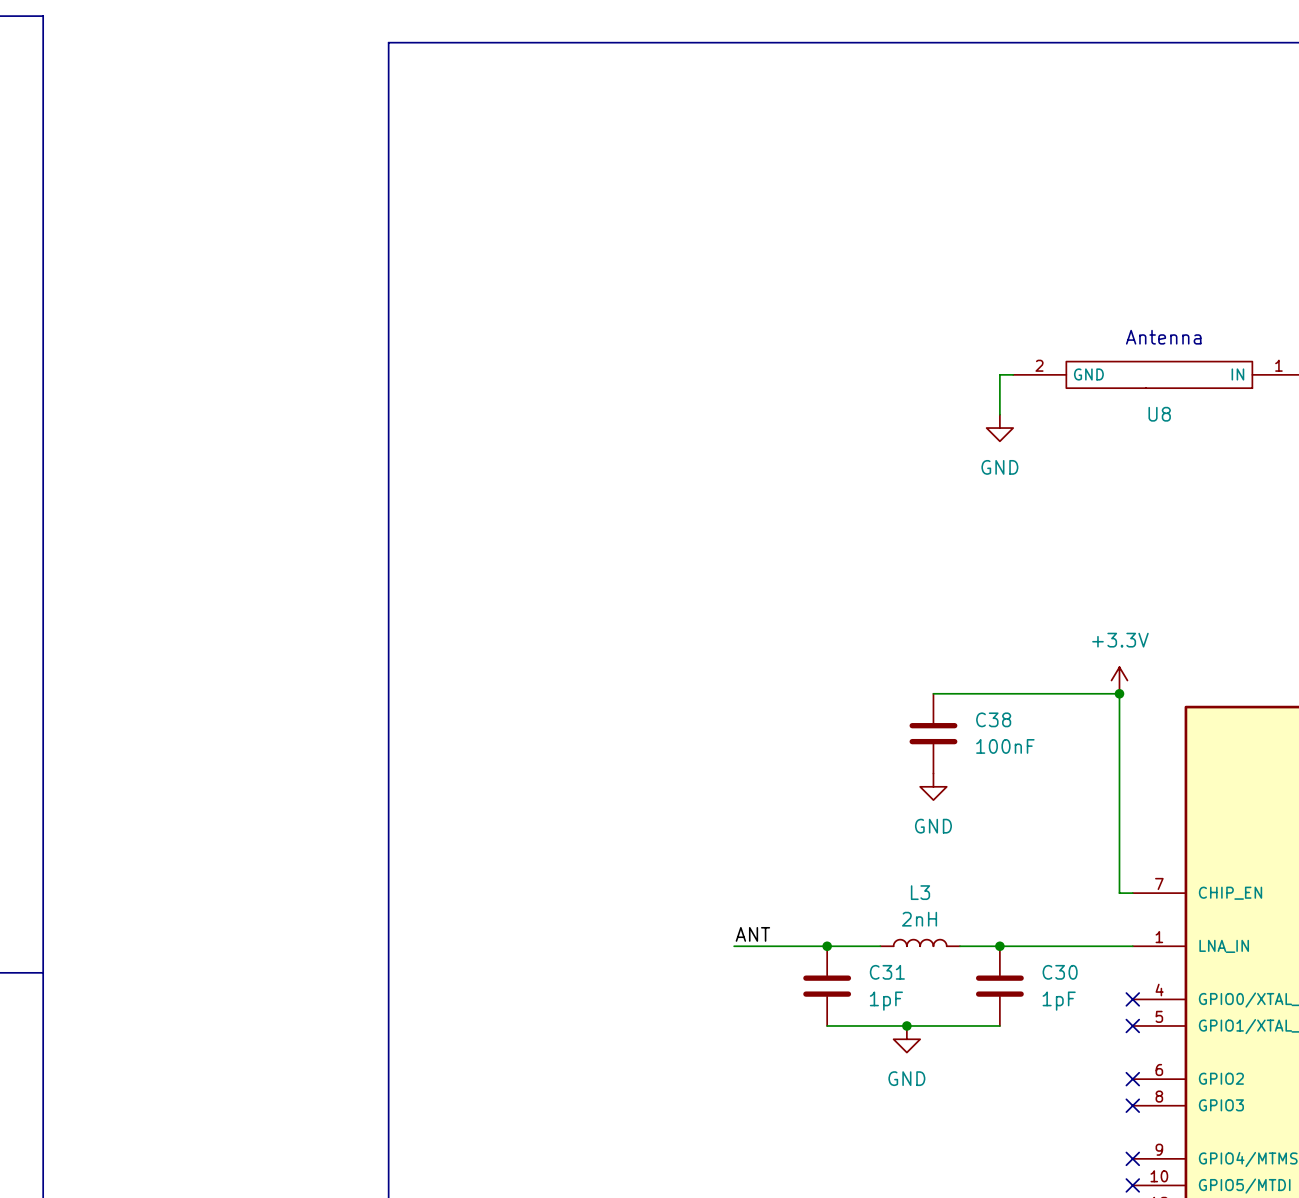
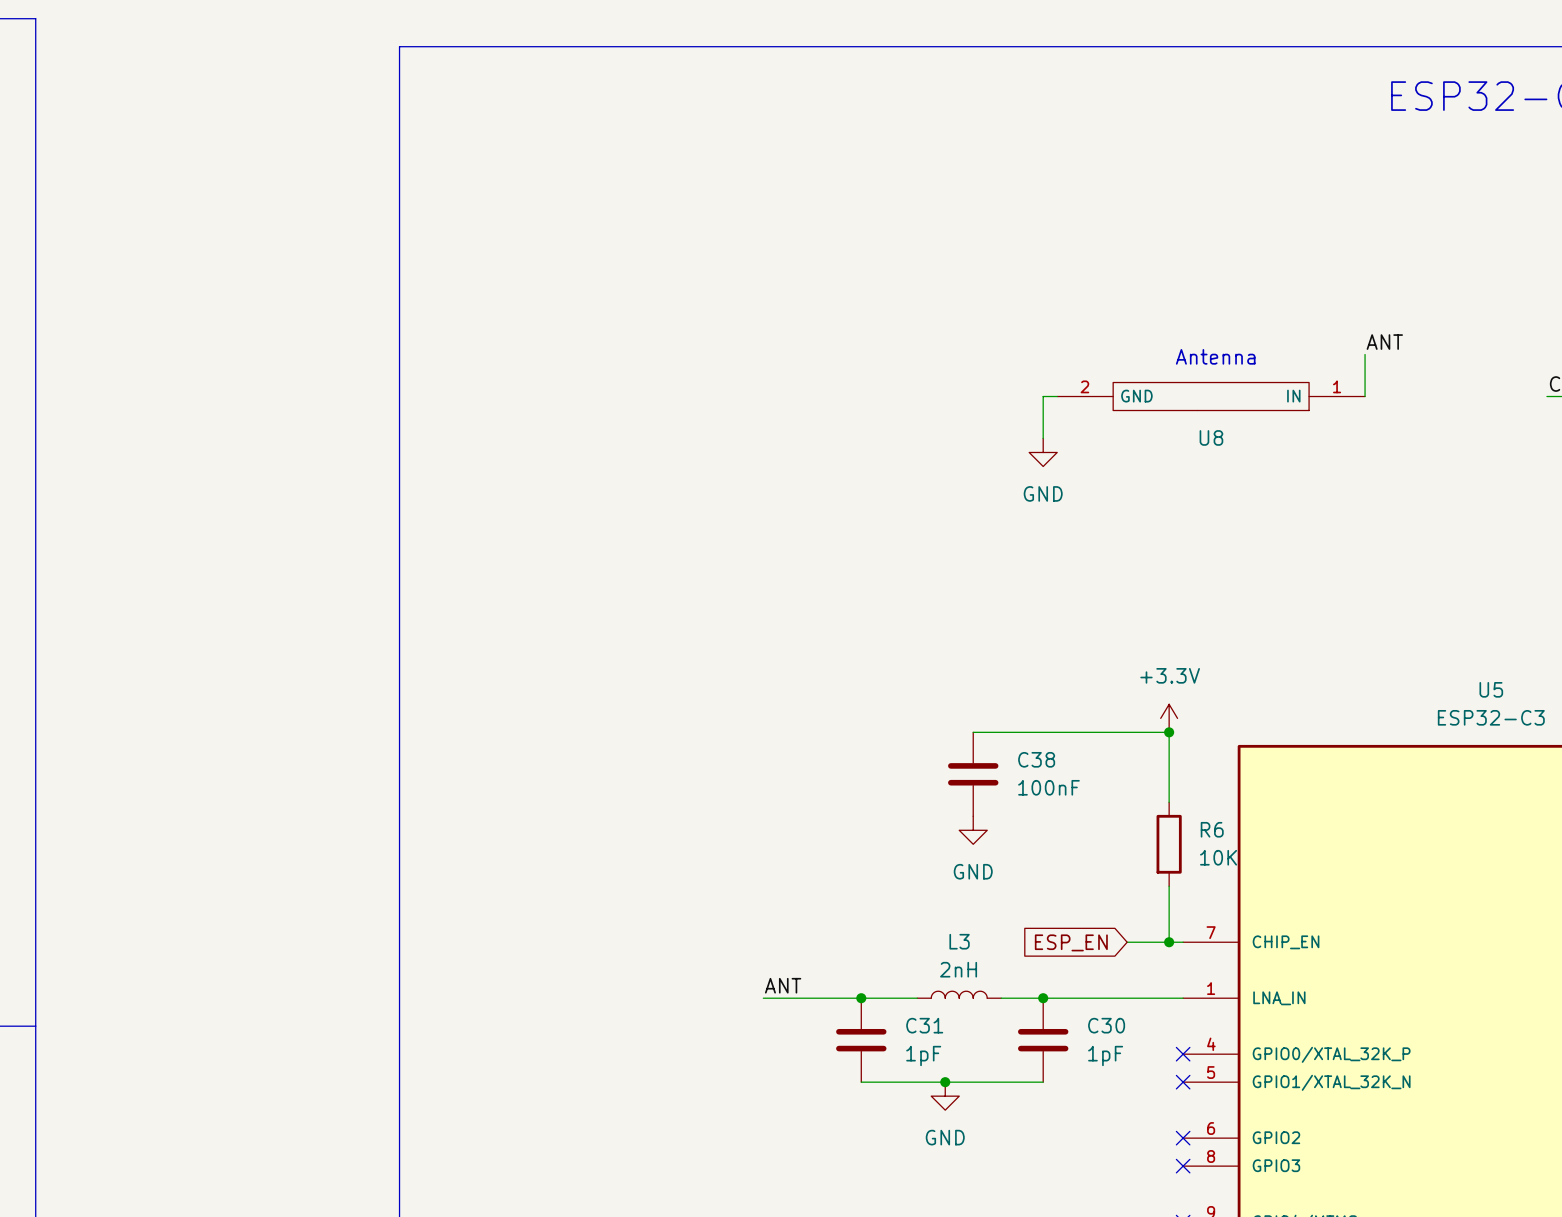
wire: (1119, 760) (1119, 839) -> none
R6: none -> 10K (1169, 844)
global label: none -> ESP_EN (1071, 942)
wire: none -> (1127, 942) (1169, 942)
junction: none -> (1169, 942)

